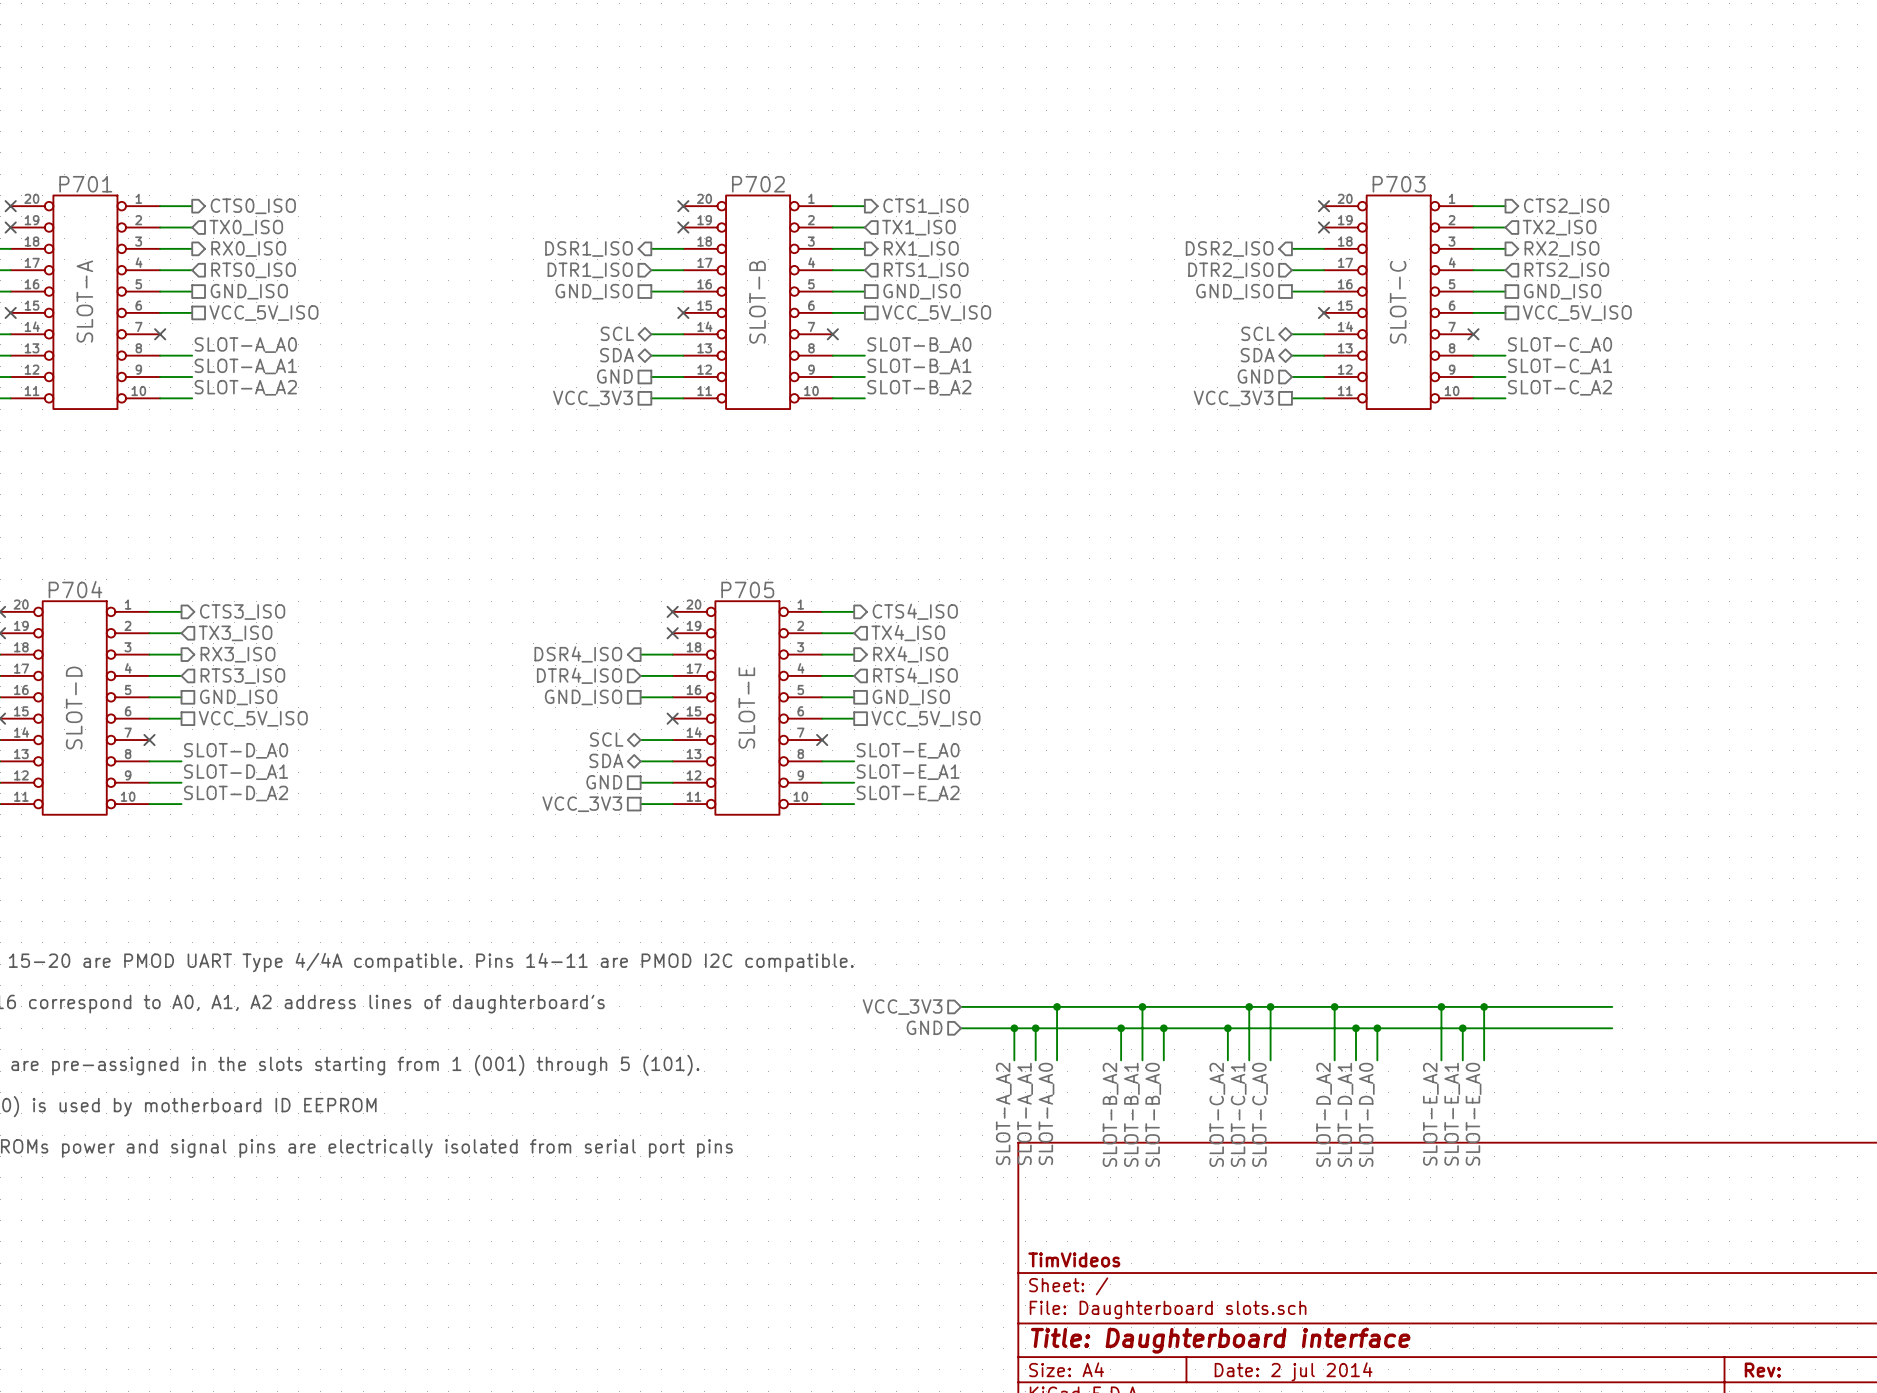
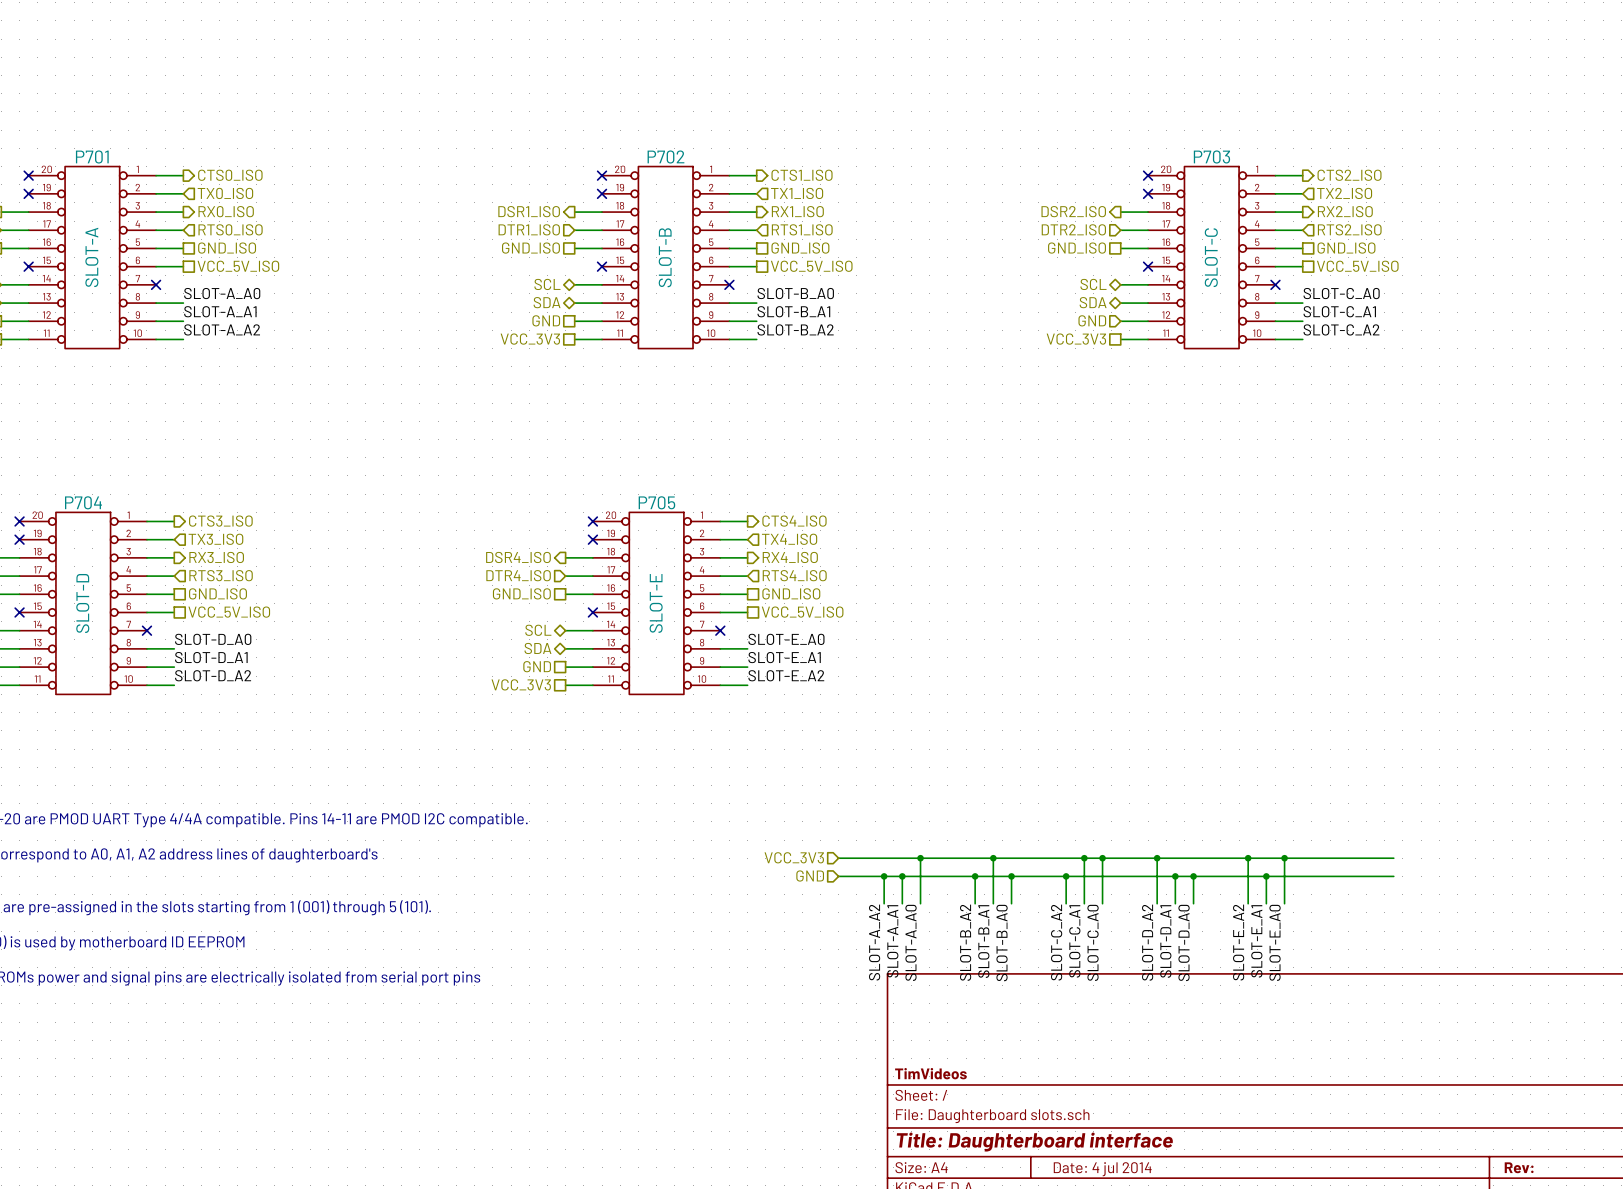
title block: Date: 2 jul 2014 (1293, 1371) -> Date: 4 jul 2014 (1102, 1169)

